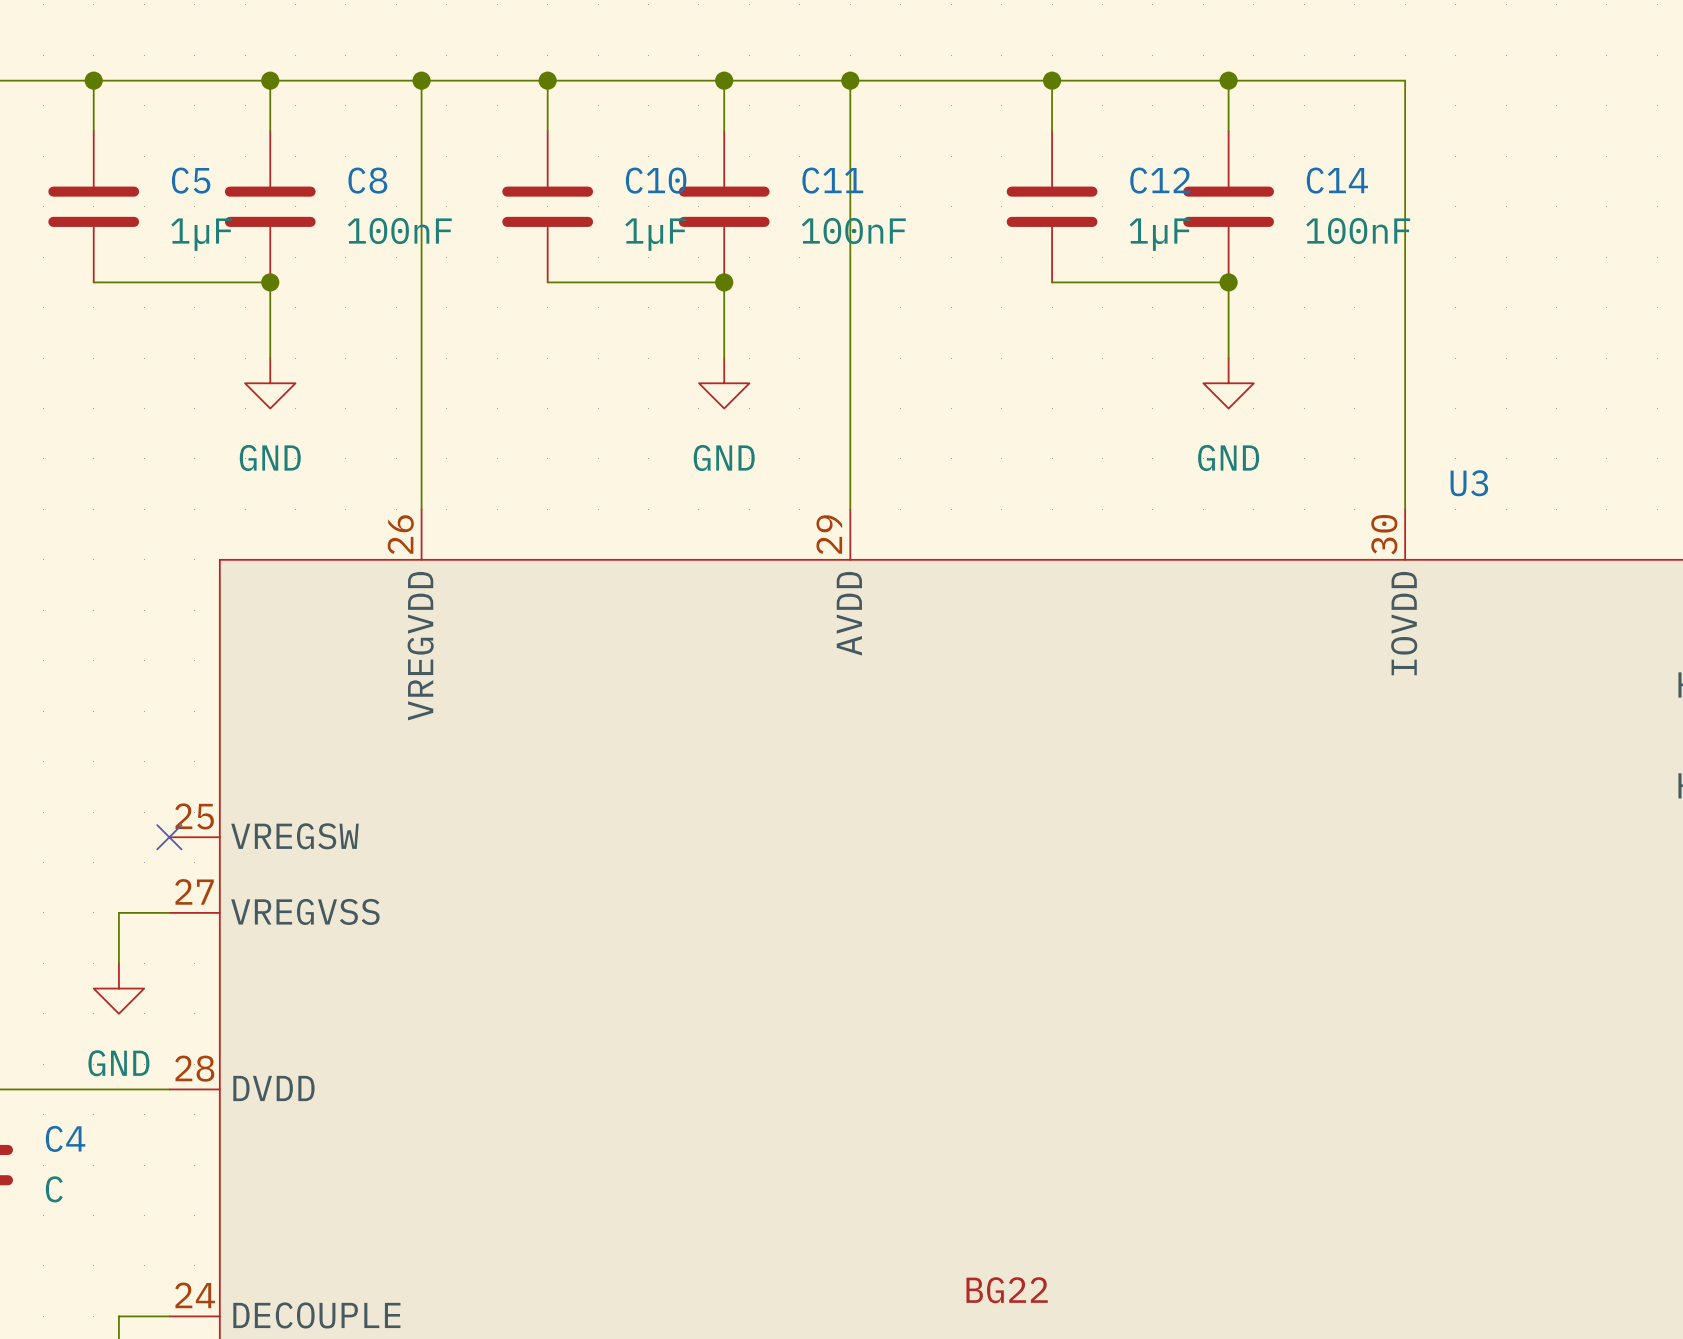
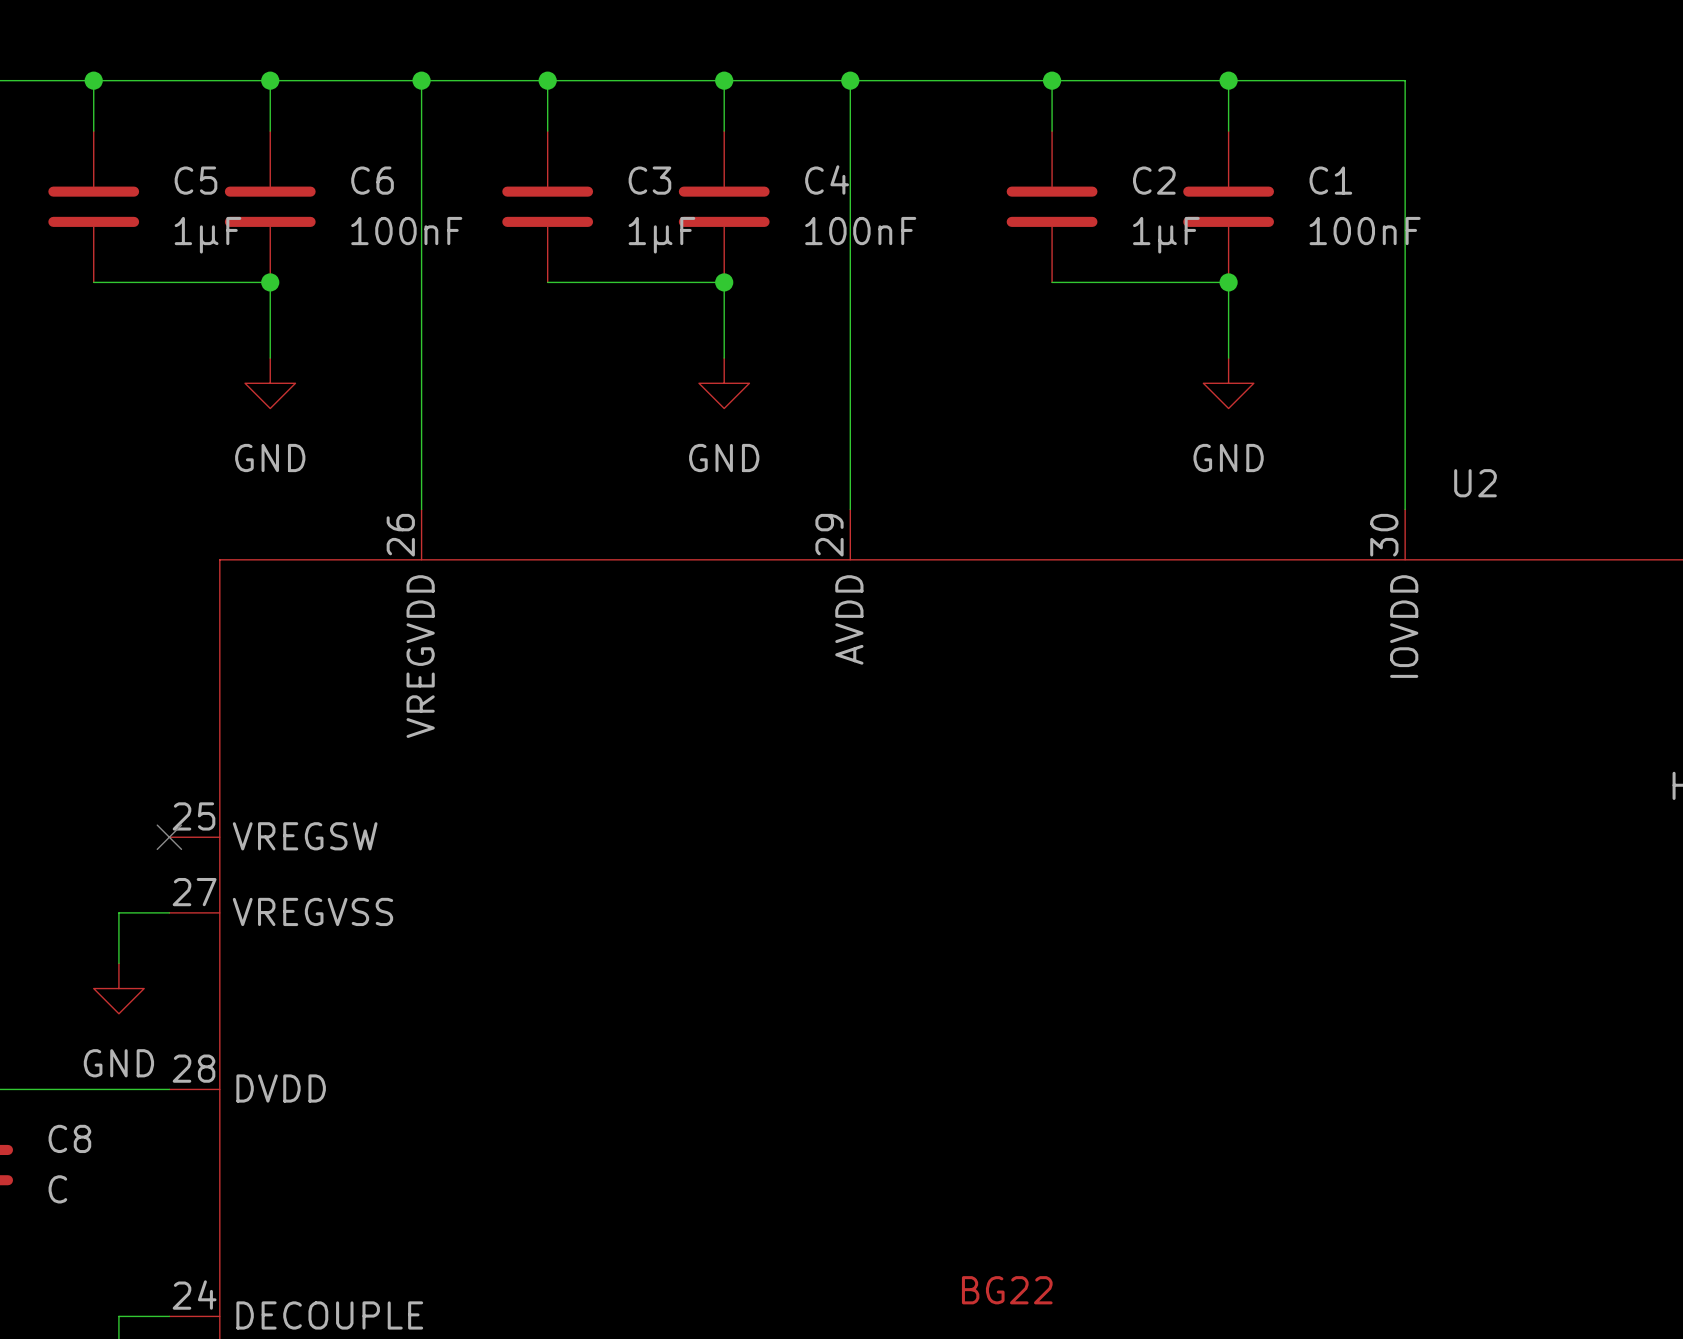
C8 name: C8 (367, 180) -> C6 (372, 180)
C10 name: C10 (656, 180) -> C3 (649, 180)
C11 name: C11 (832, 180) -> C4 (827, 179)
C12 name: C12 (1160, 180) -> C2 (1154, 180)
C14 name: C14 (1337, 180) -> C1 (1330, 180)
U3 name: U3 (1469, 483) -> U2 (1475, 483)
C4 name: C4 (65, 1138) -> C8 (69, 1138)

